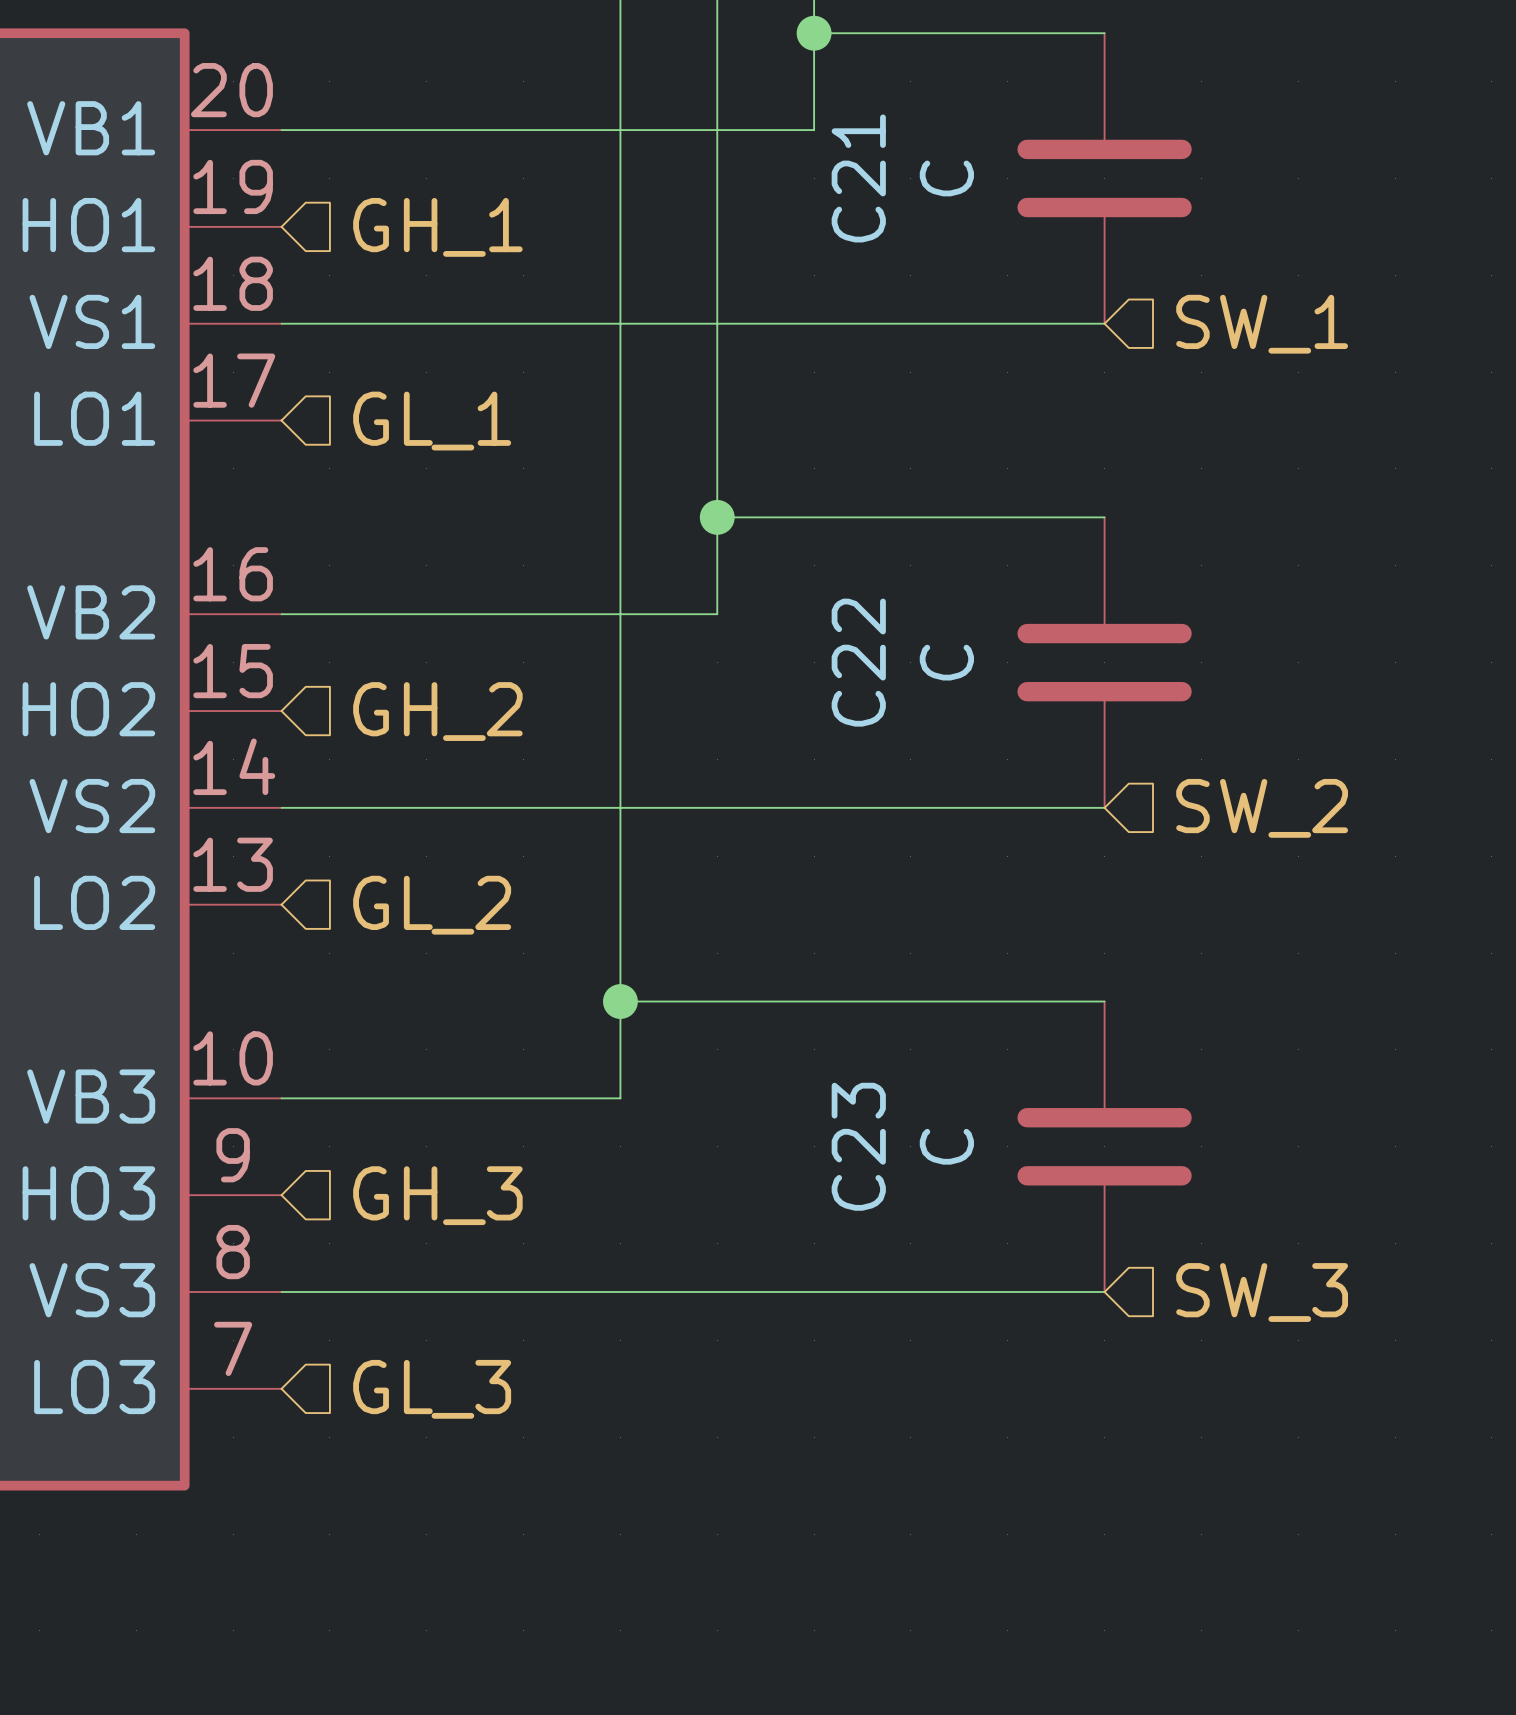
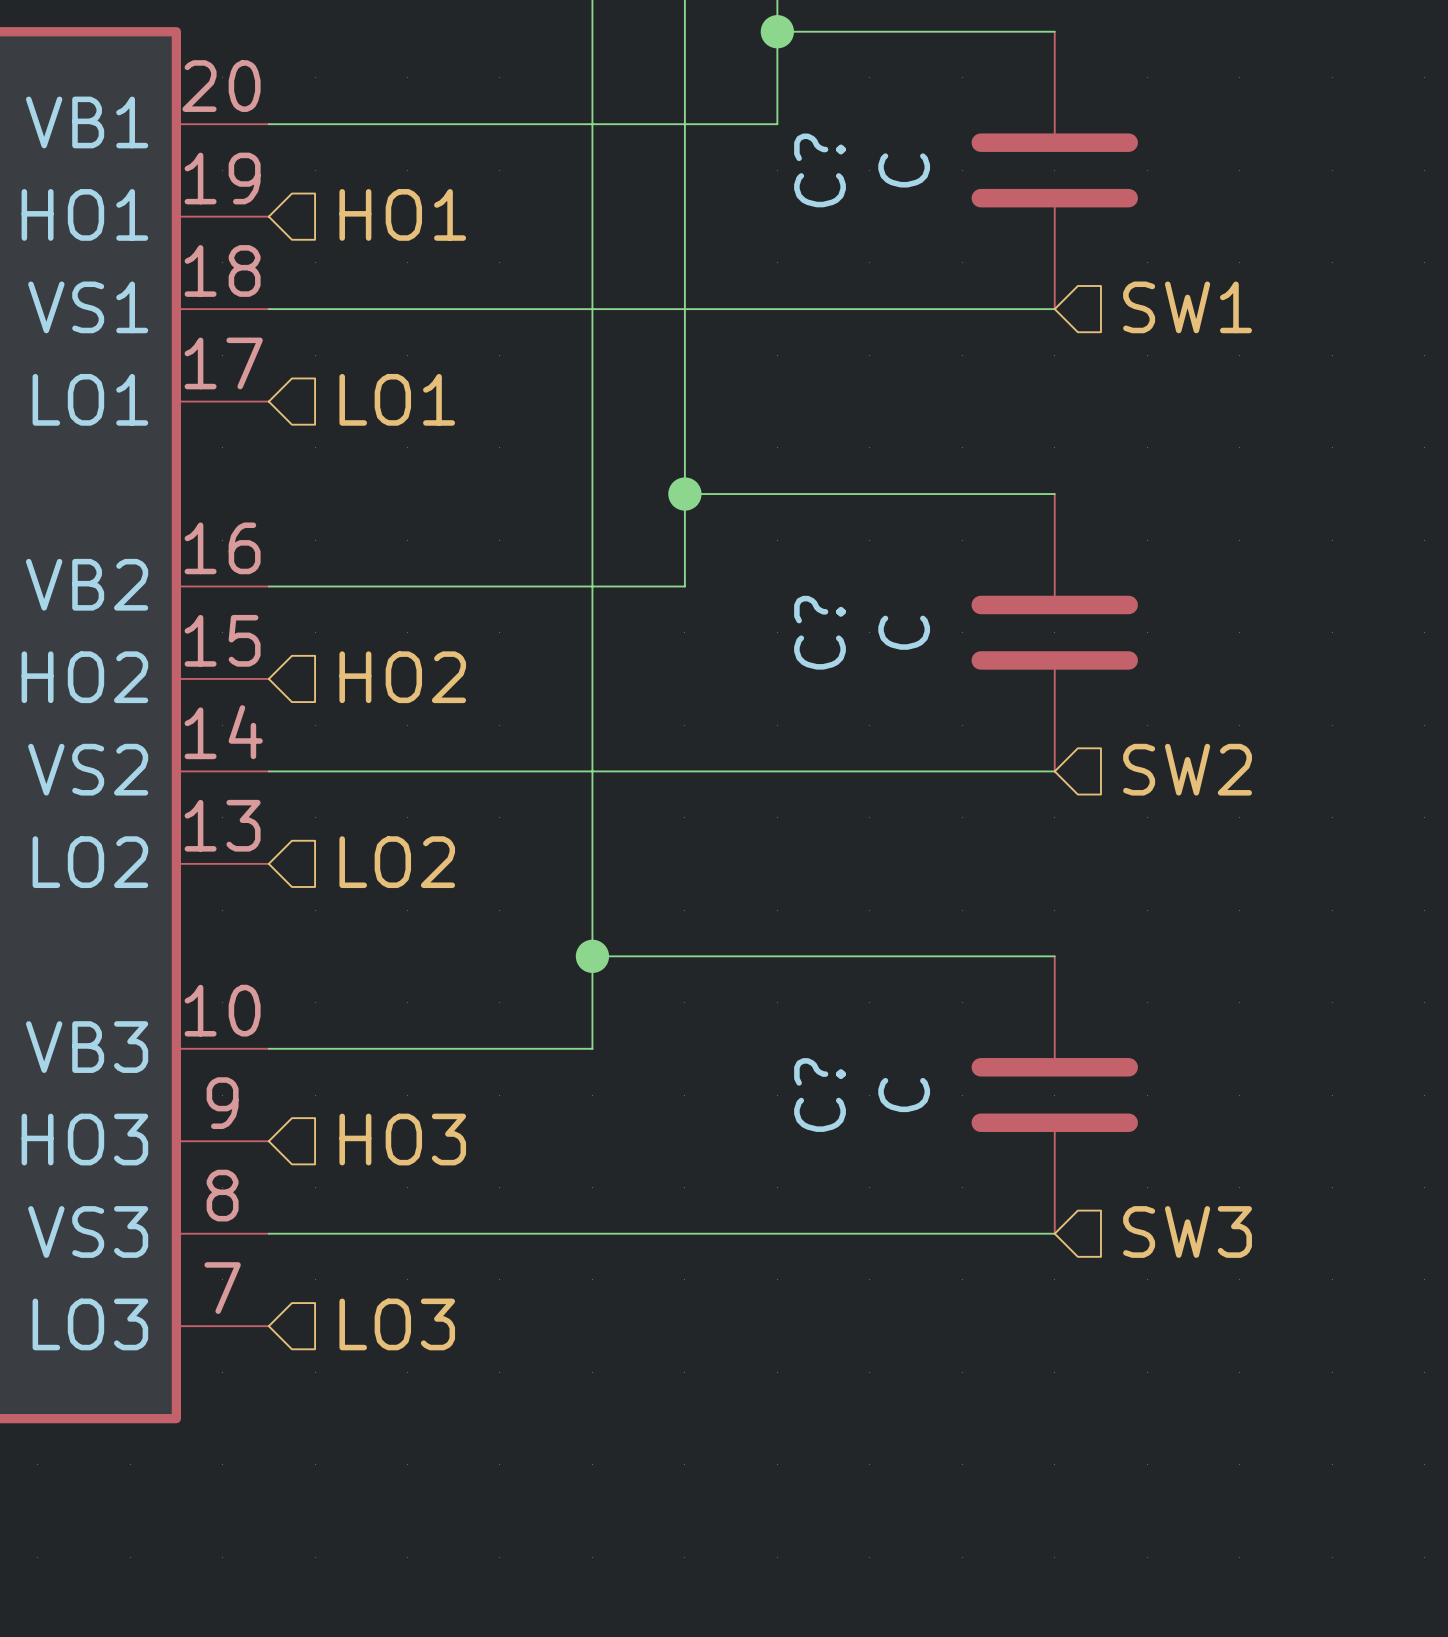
C21 name: C21 (858, 178) -> C? (820, 170)
hierarchical label: GH_1 (437, 227) -> HO1 (402, 214)
hierarchical label: SW_1 (1262, 324) -> SW1 (1187, 307)
hierarchical label: GL_1 (432, 421) -> LO1 (397, 399)
C22 name: C22 (858, 662) -> C? (820, 632)
hierarchical label: GH_2 (437, 711) -> HO2 (402, 677)
hierarchical label: SW_2 (1262, 808) -> SW2 (1187, 769)
hierarchical label: GL_2 (432, 905) -> LO2 (397, 862)
C23 name: C23 (858, 1146) -> C? (820, 1095)
hierarchical label: GH_3 (437, 1195) -> HO3 (402, 1139)
hierarchical label: SW_3 (1262, 1292) -> SW3 (1187, 1231)
hierarchical label: GL_3 (432, 1389) -> LO3 (397, 1324)

